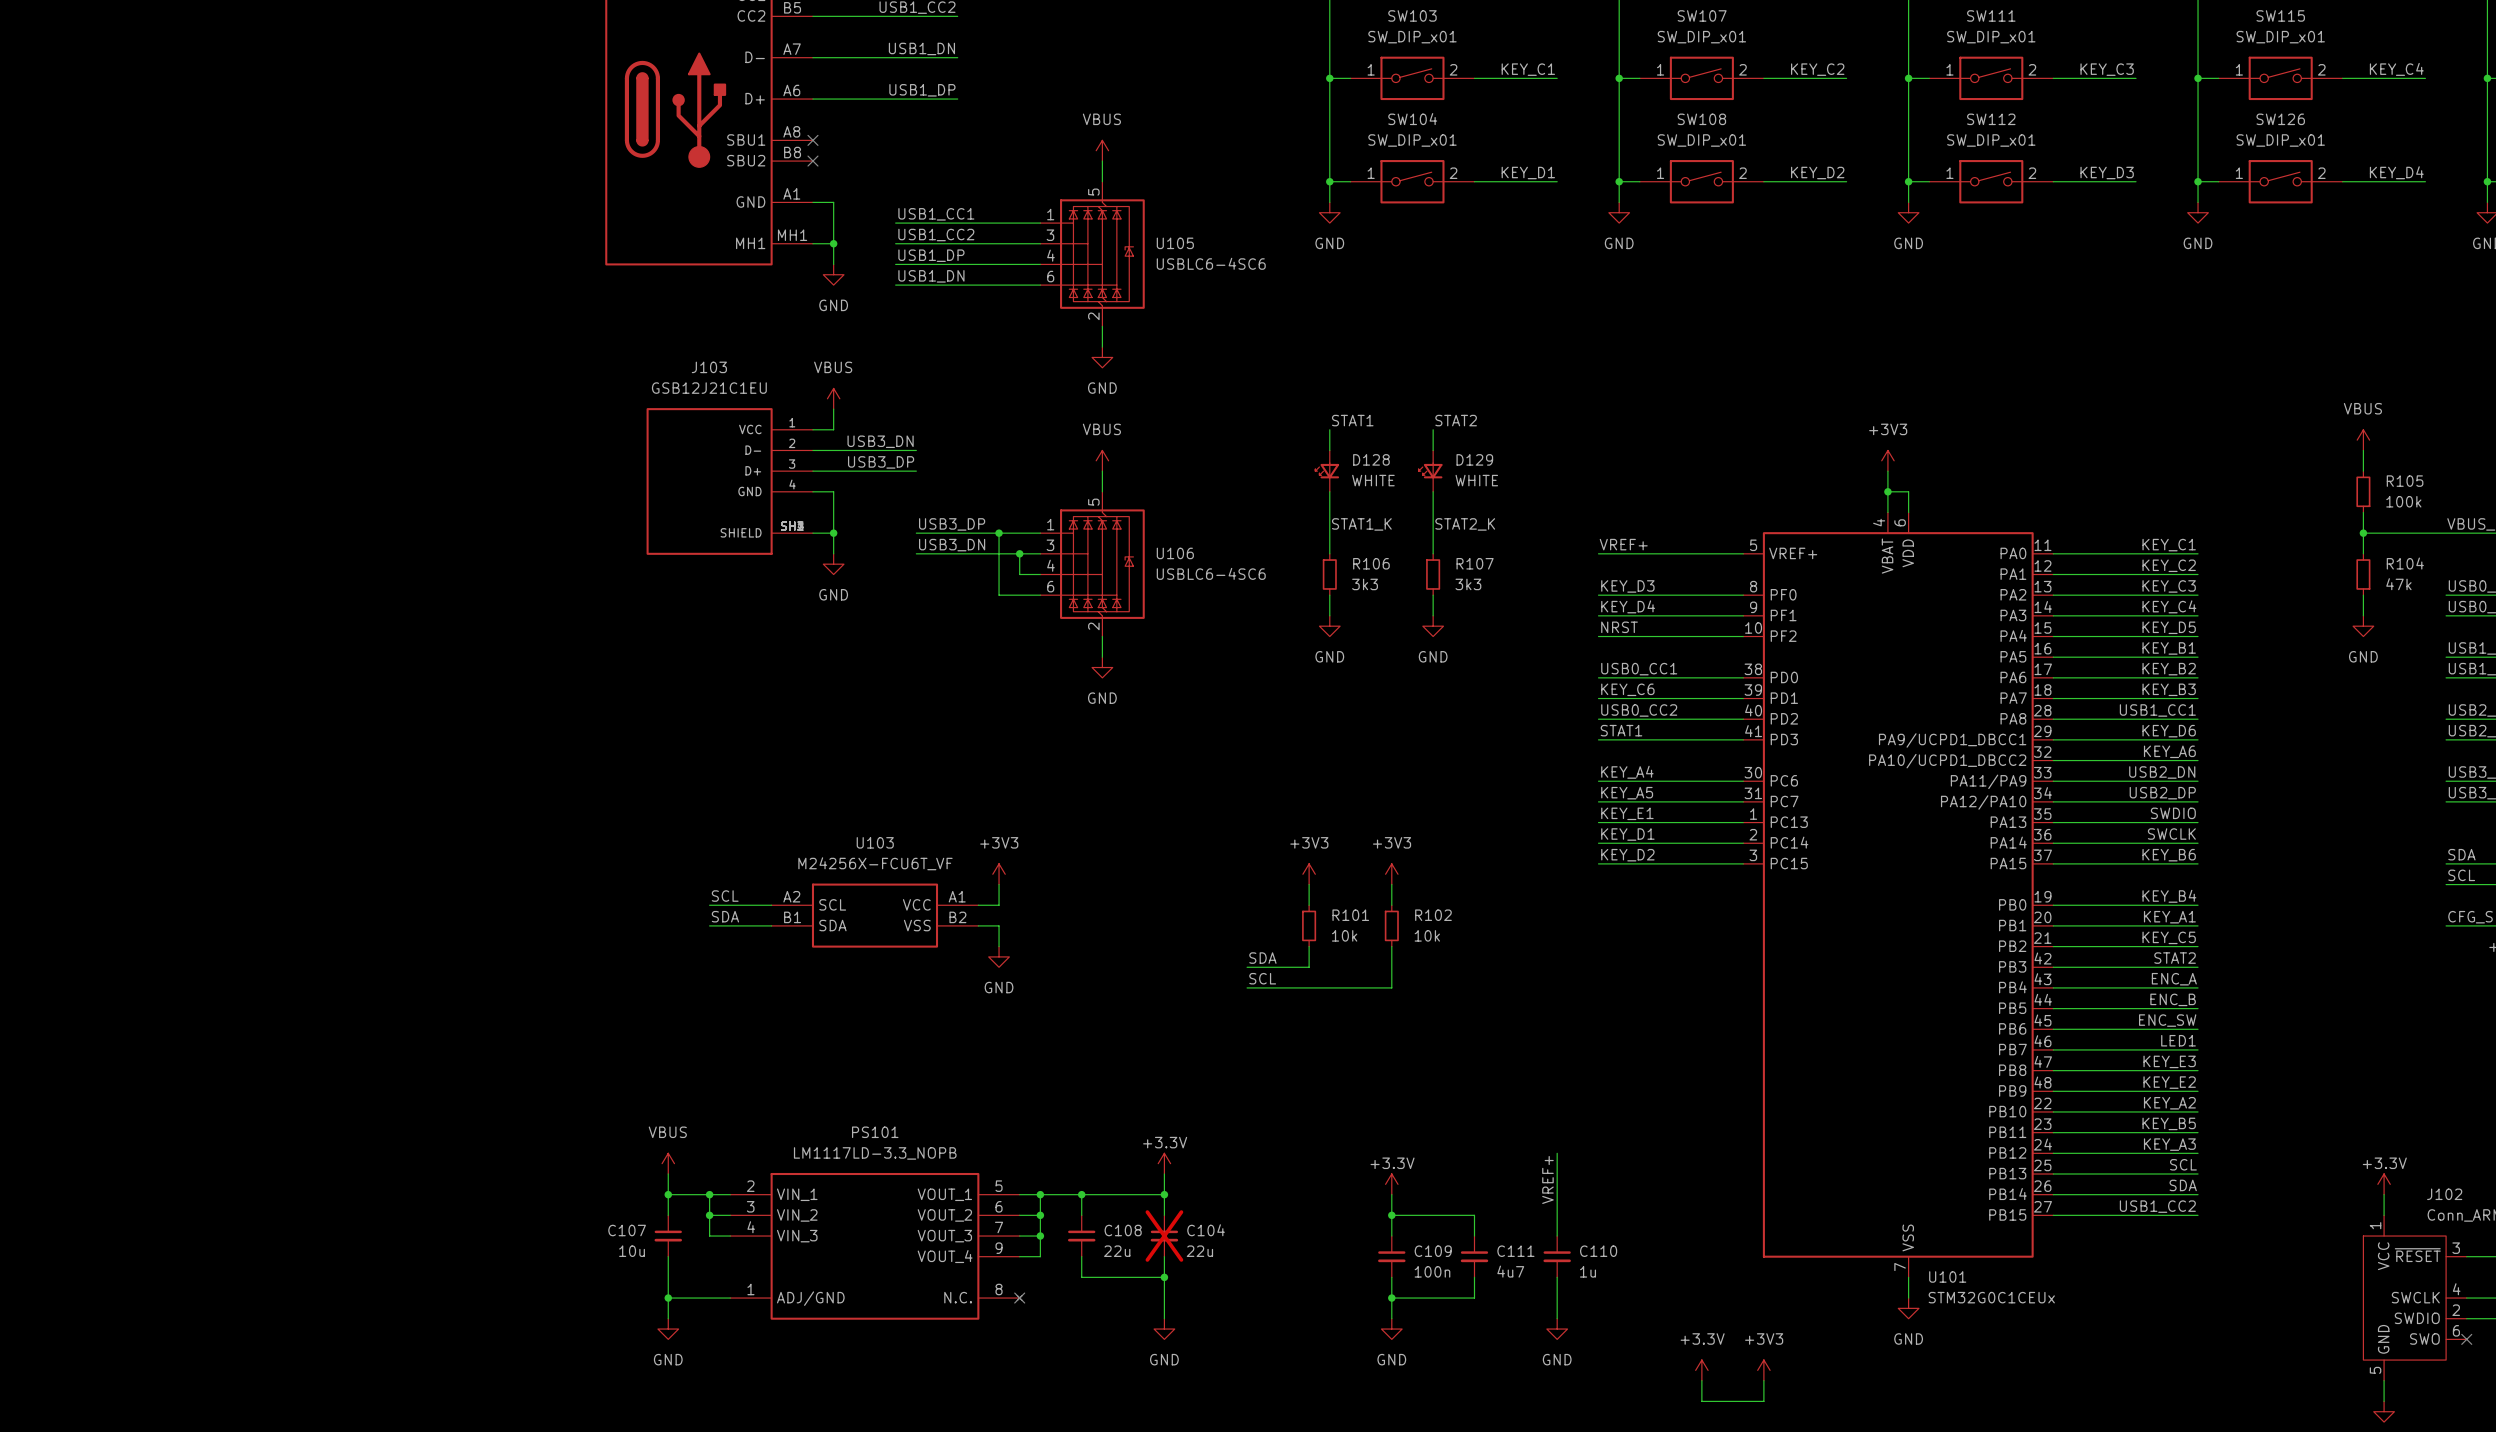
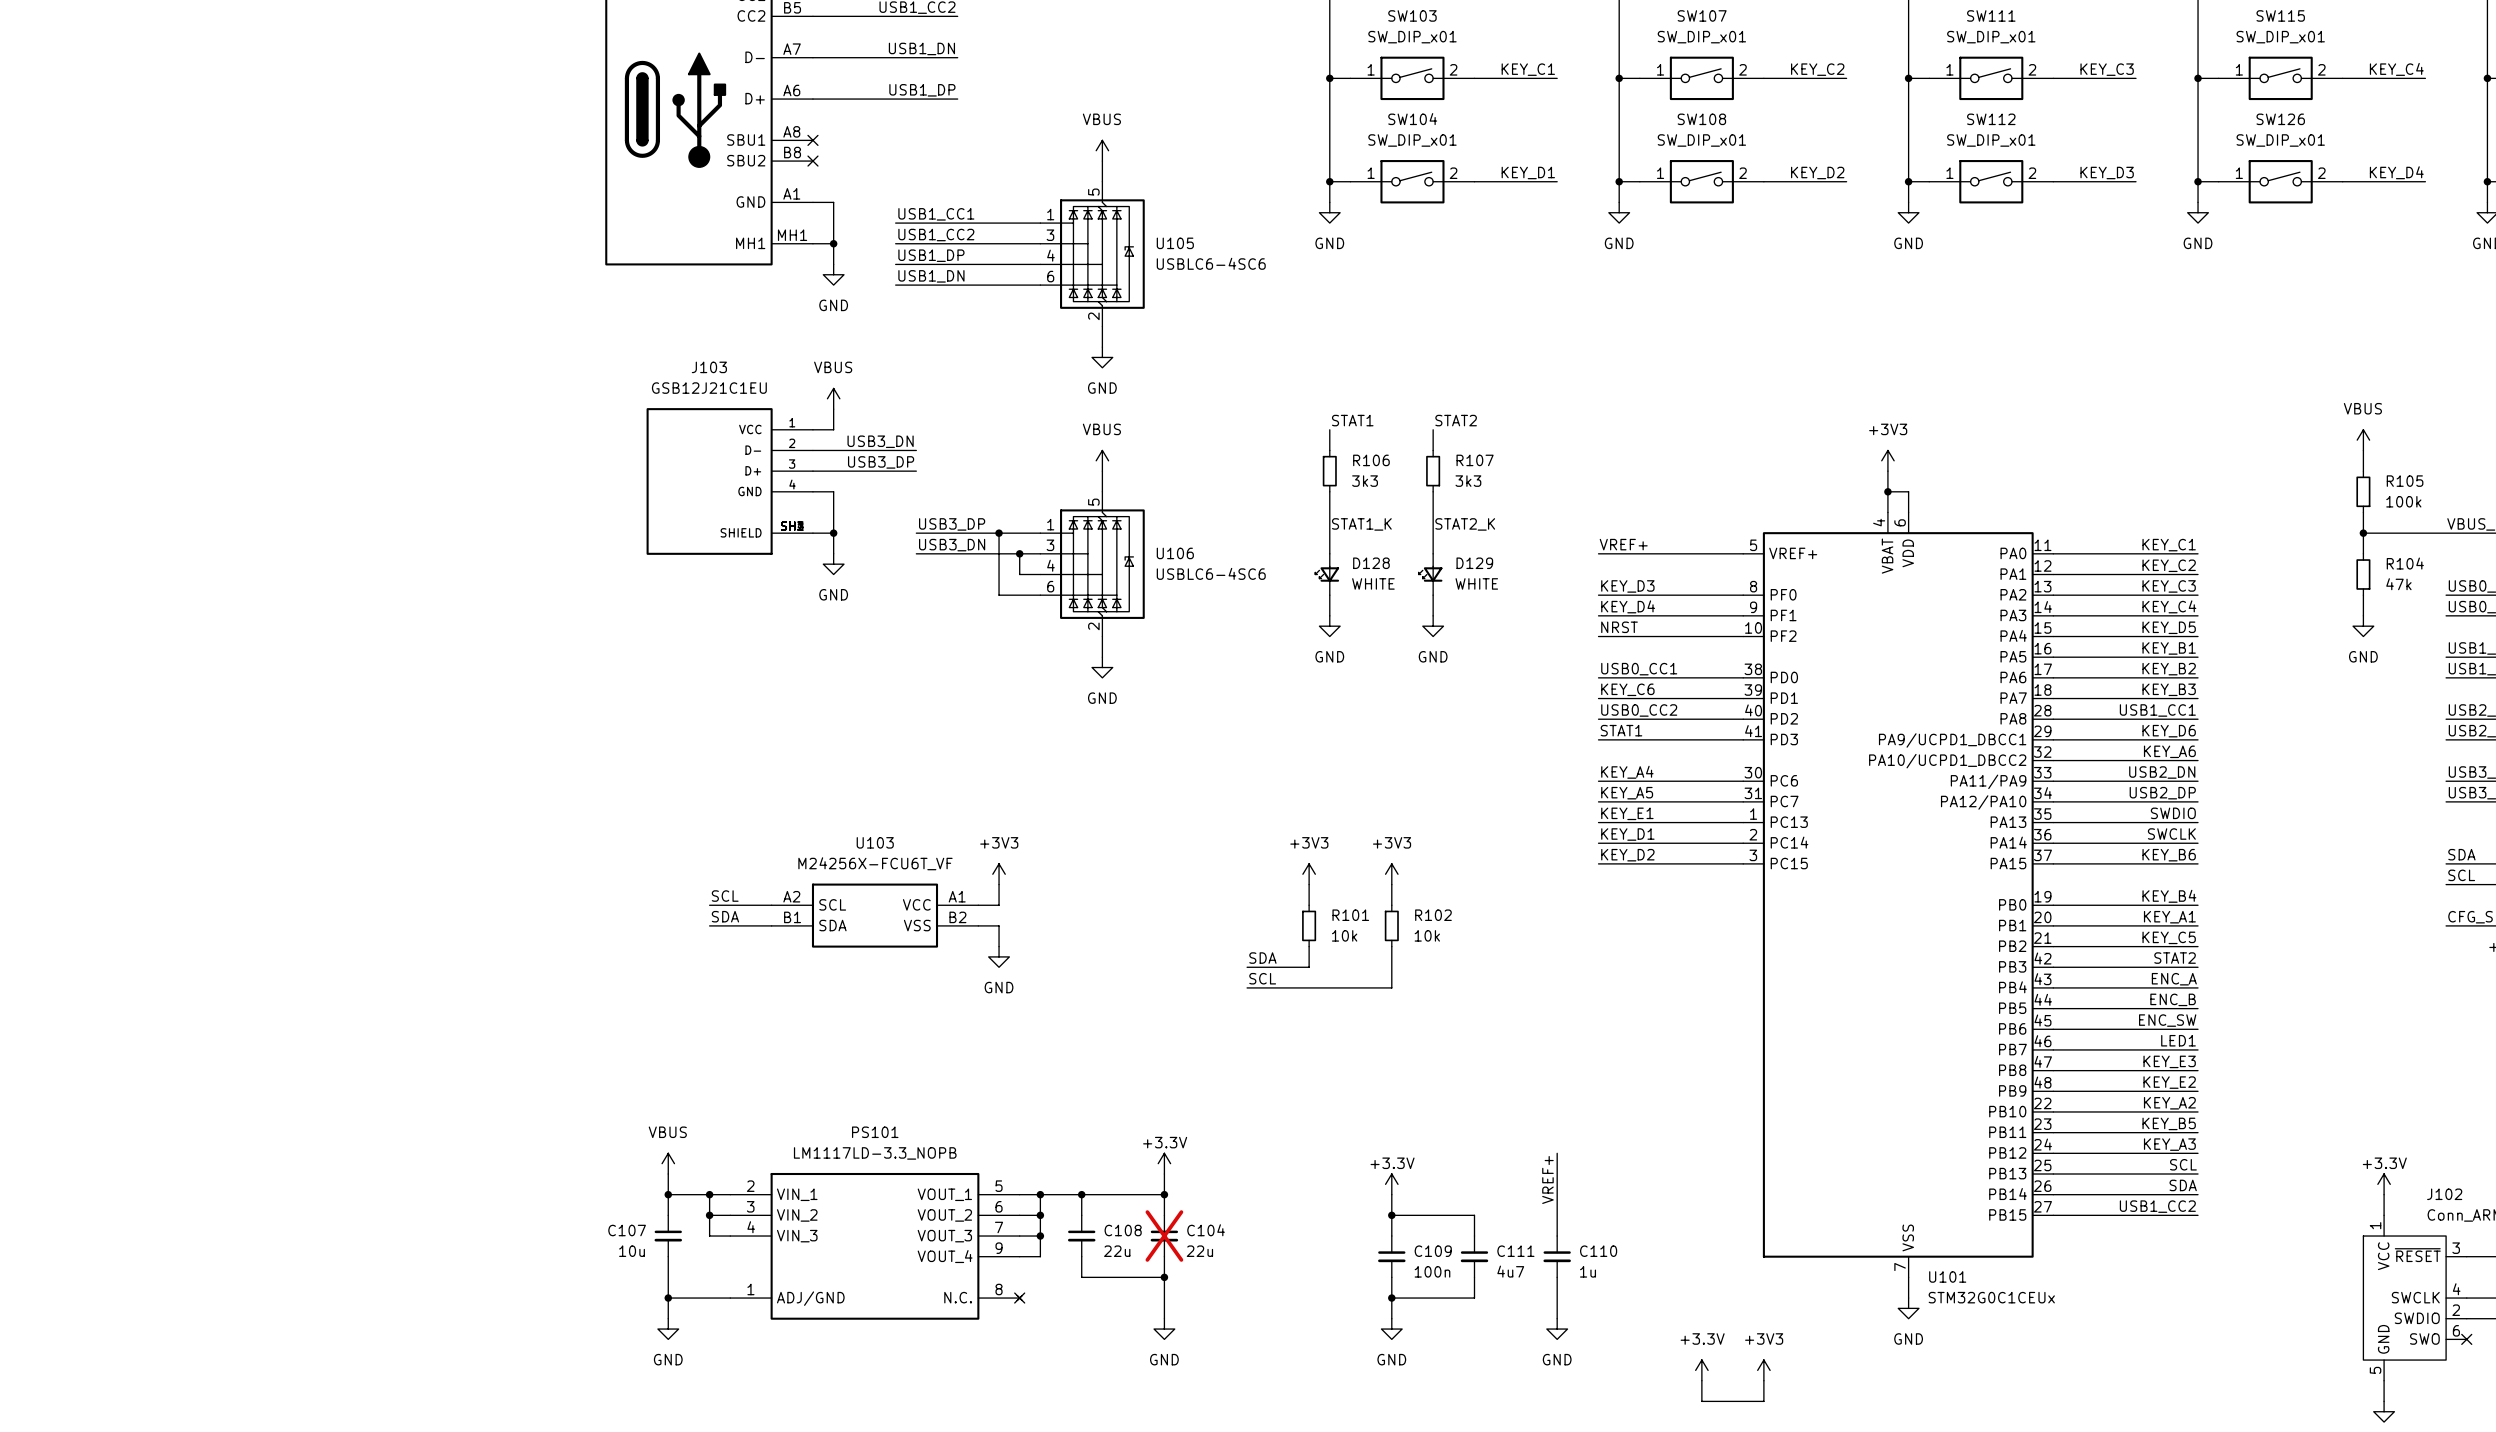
D128 position: (1327, 471) -> (1327, 574)
D129 position: (1430, 471) -> (1430, 574)
R106 position: (1329, 574) -> (1329, 471)
R107 position: (1433, 574) -> (1433, 471)

